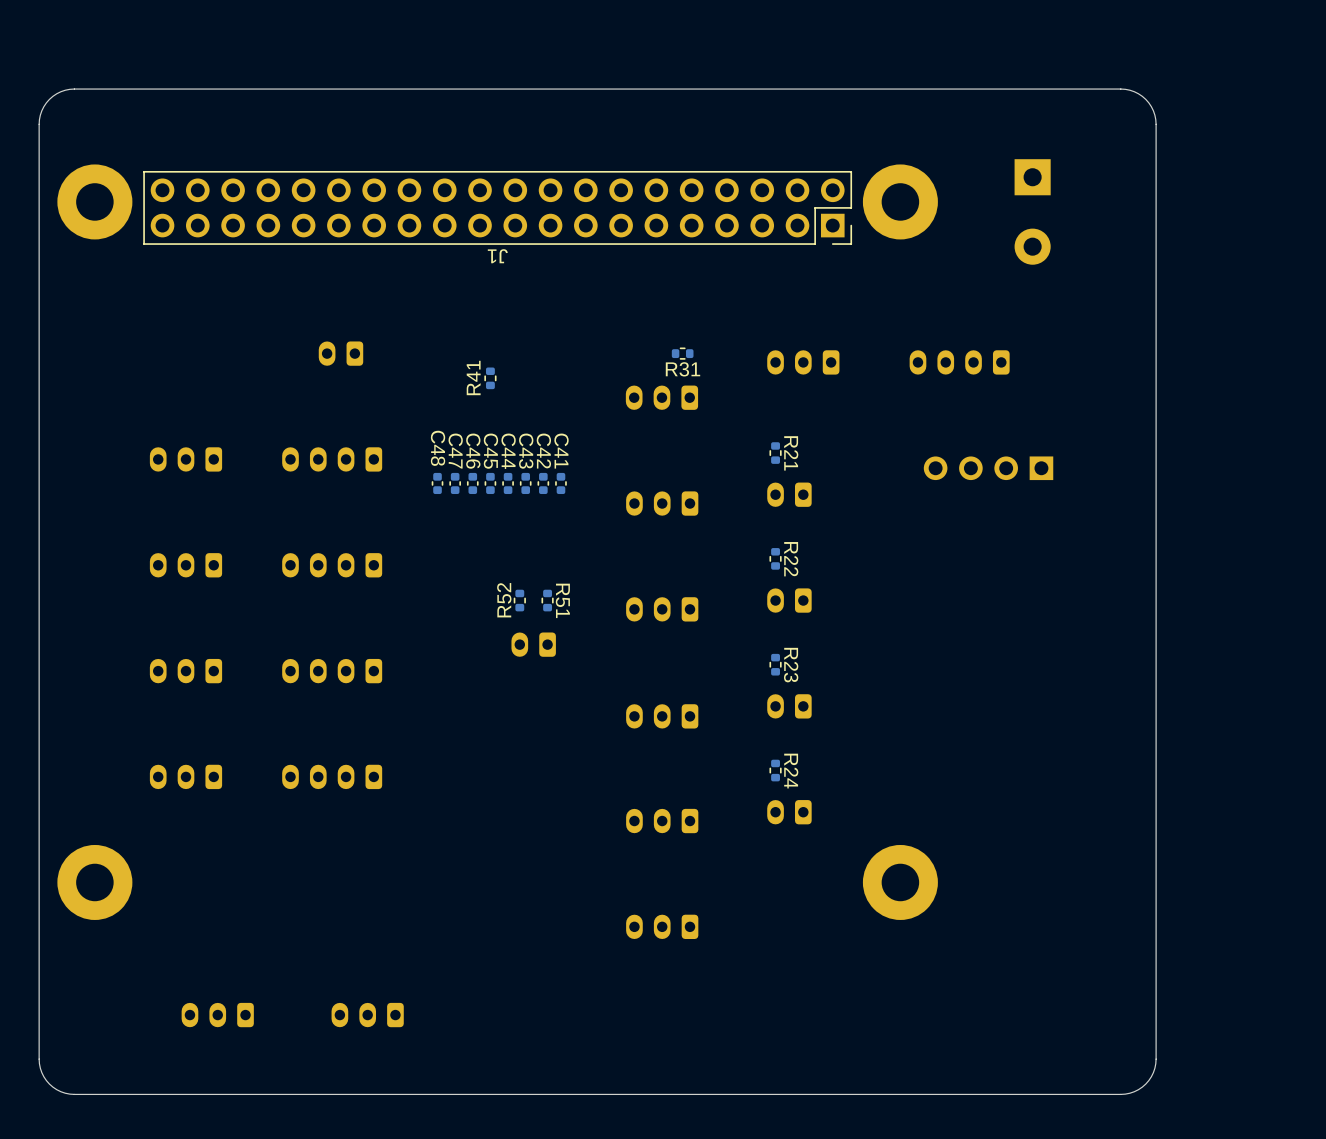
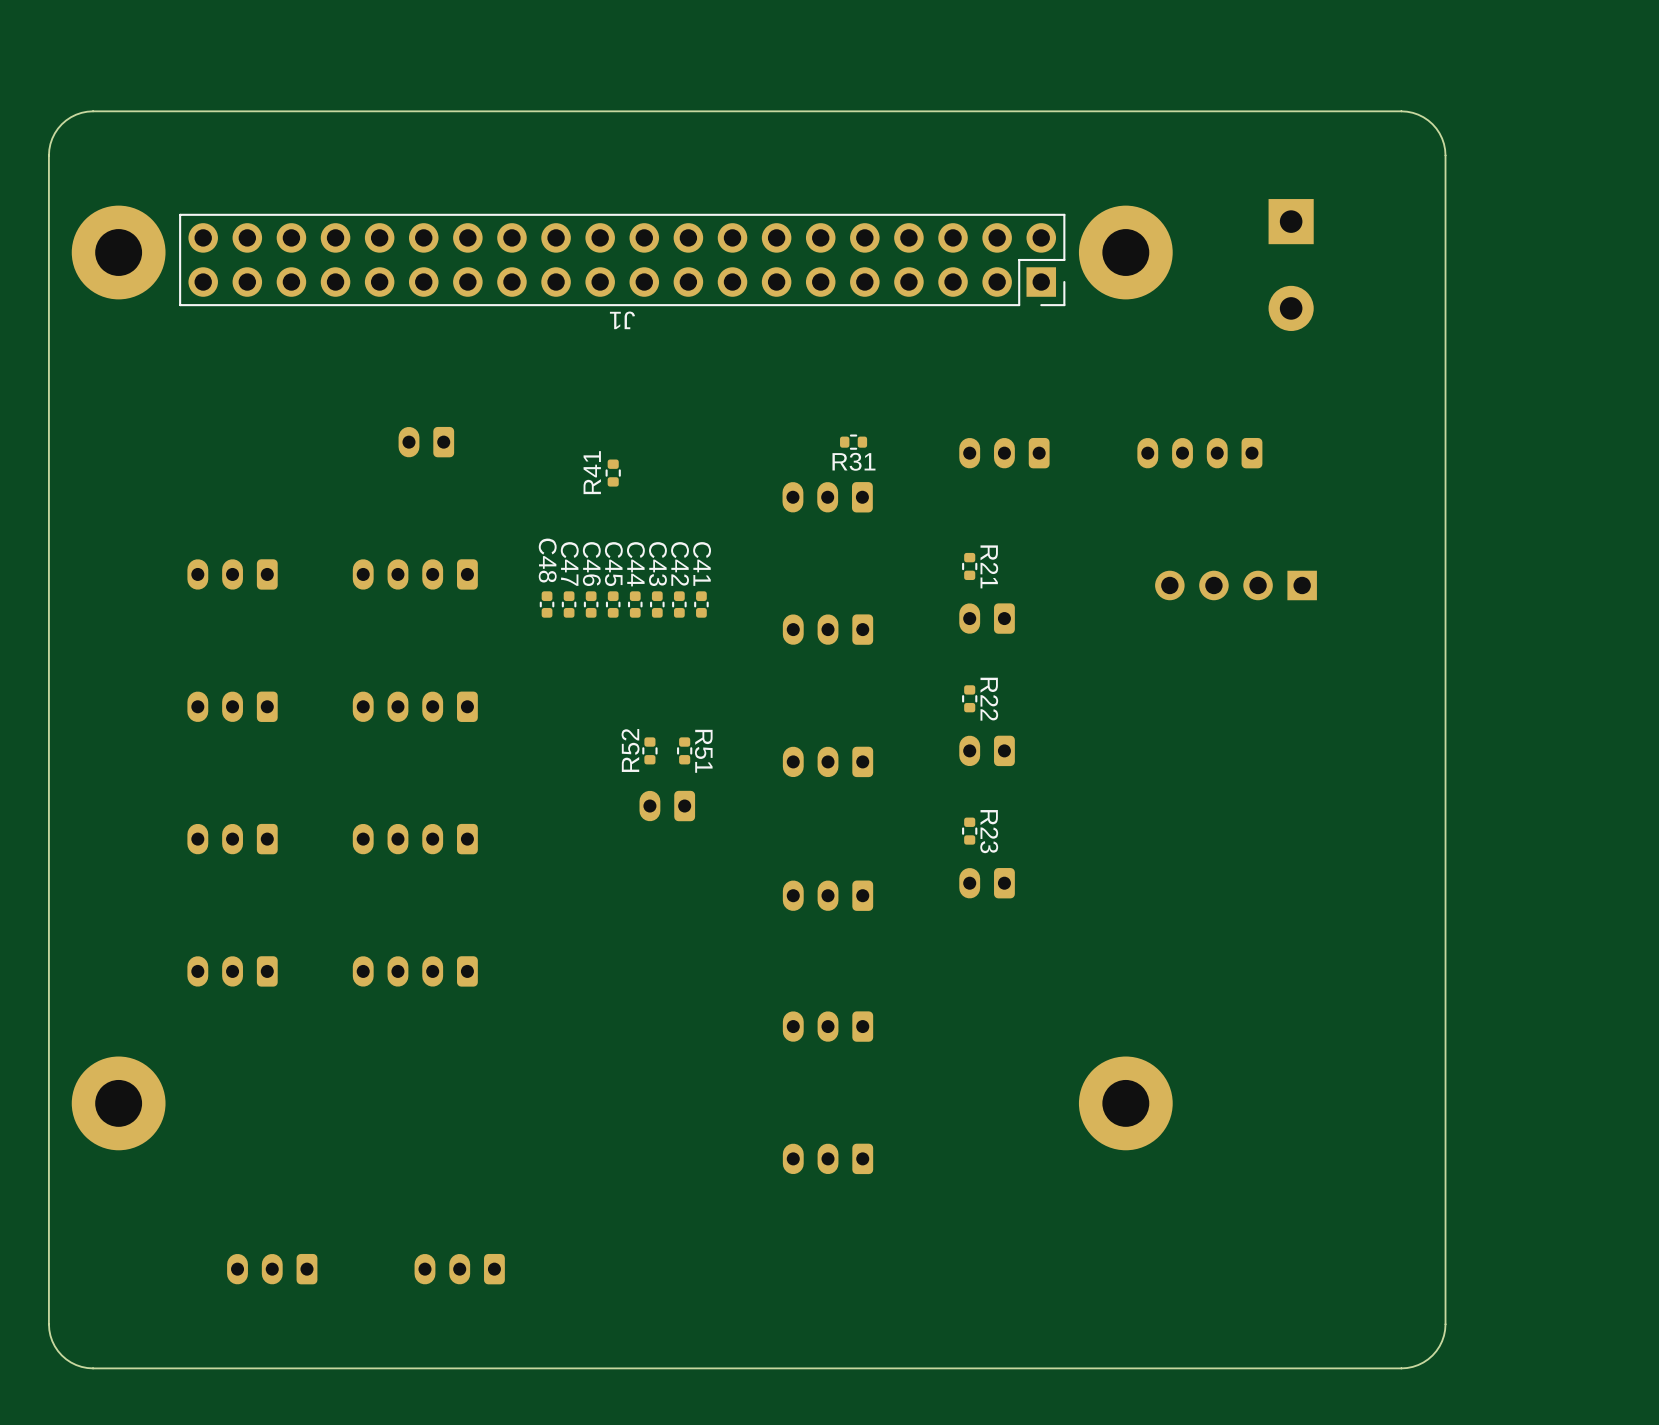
R24: (775, 770) -> none
part: (789, 812) -> none

